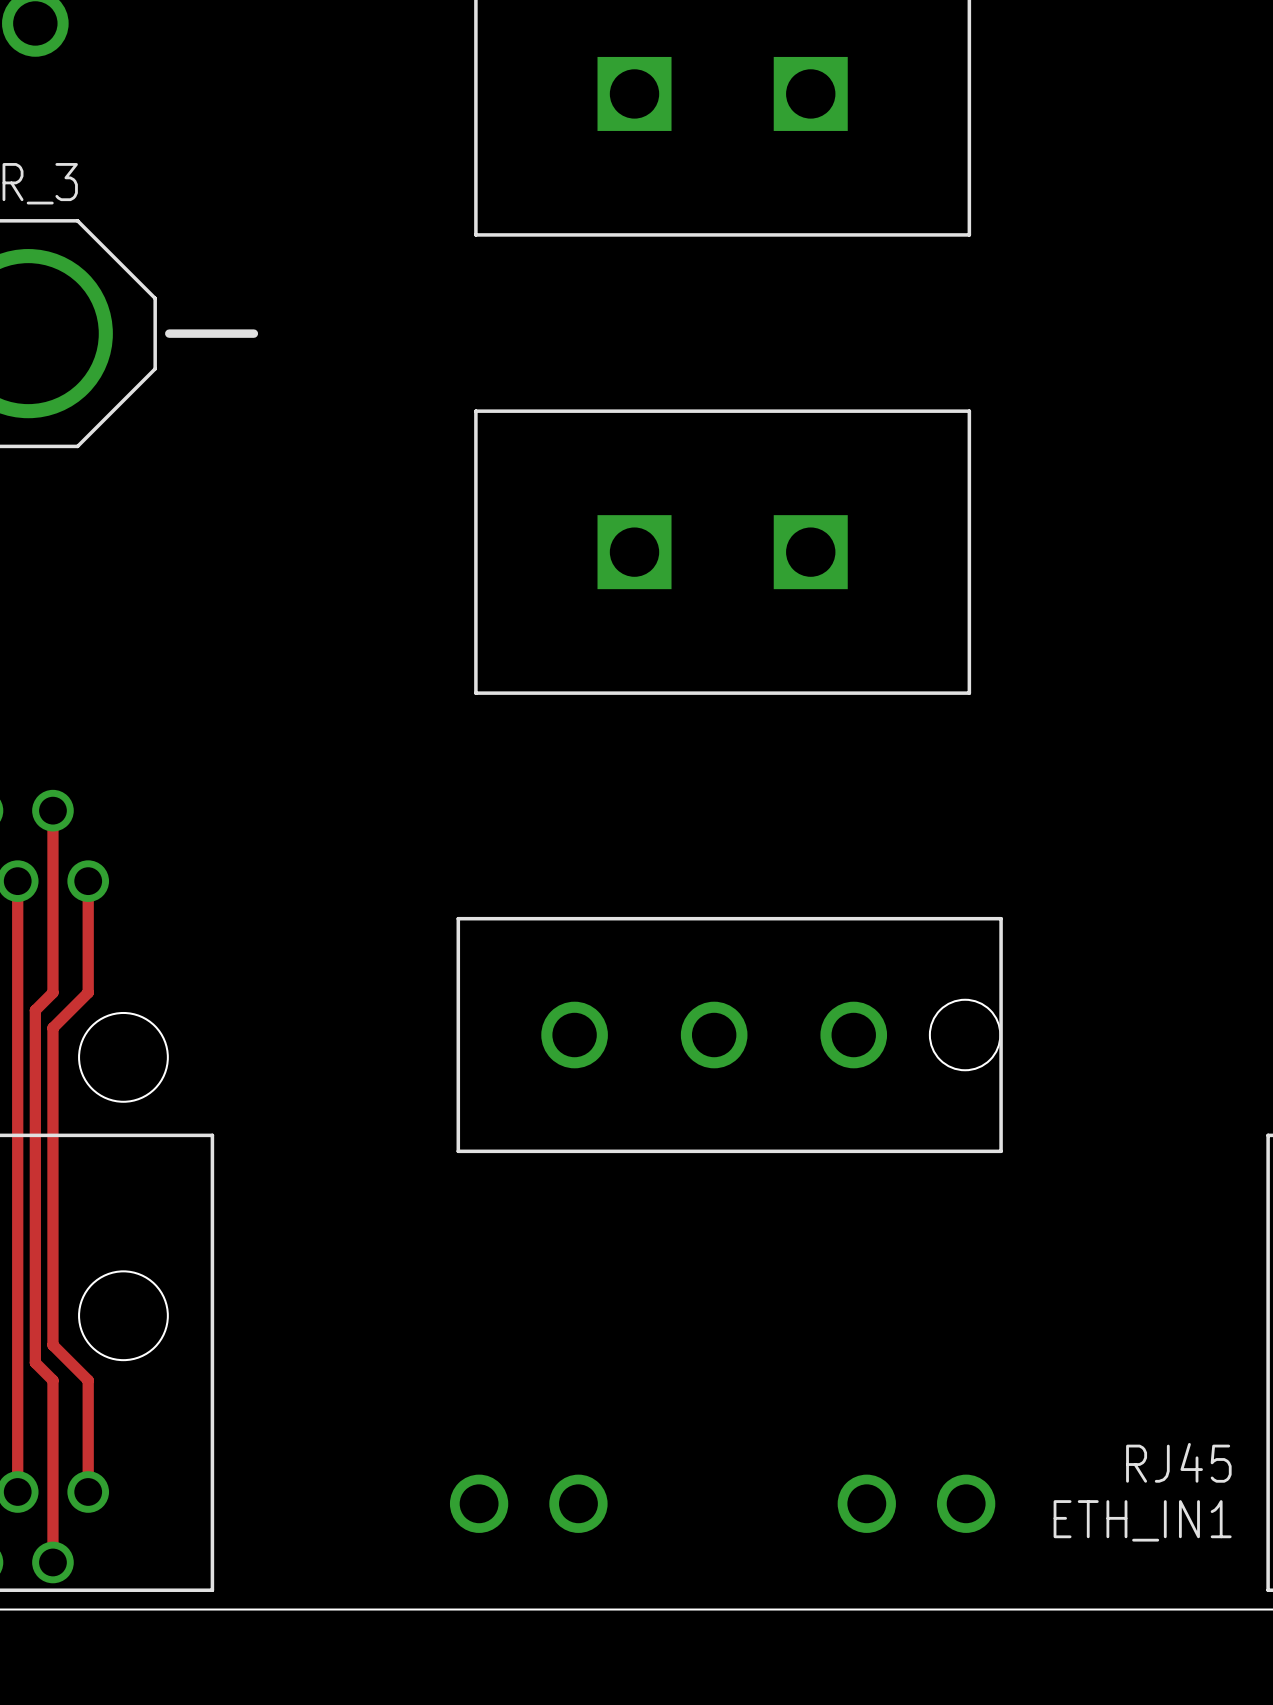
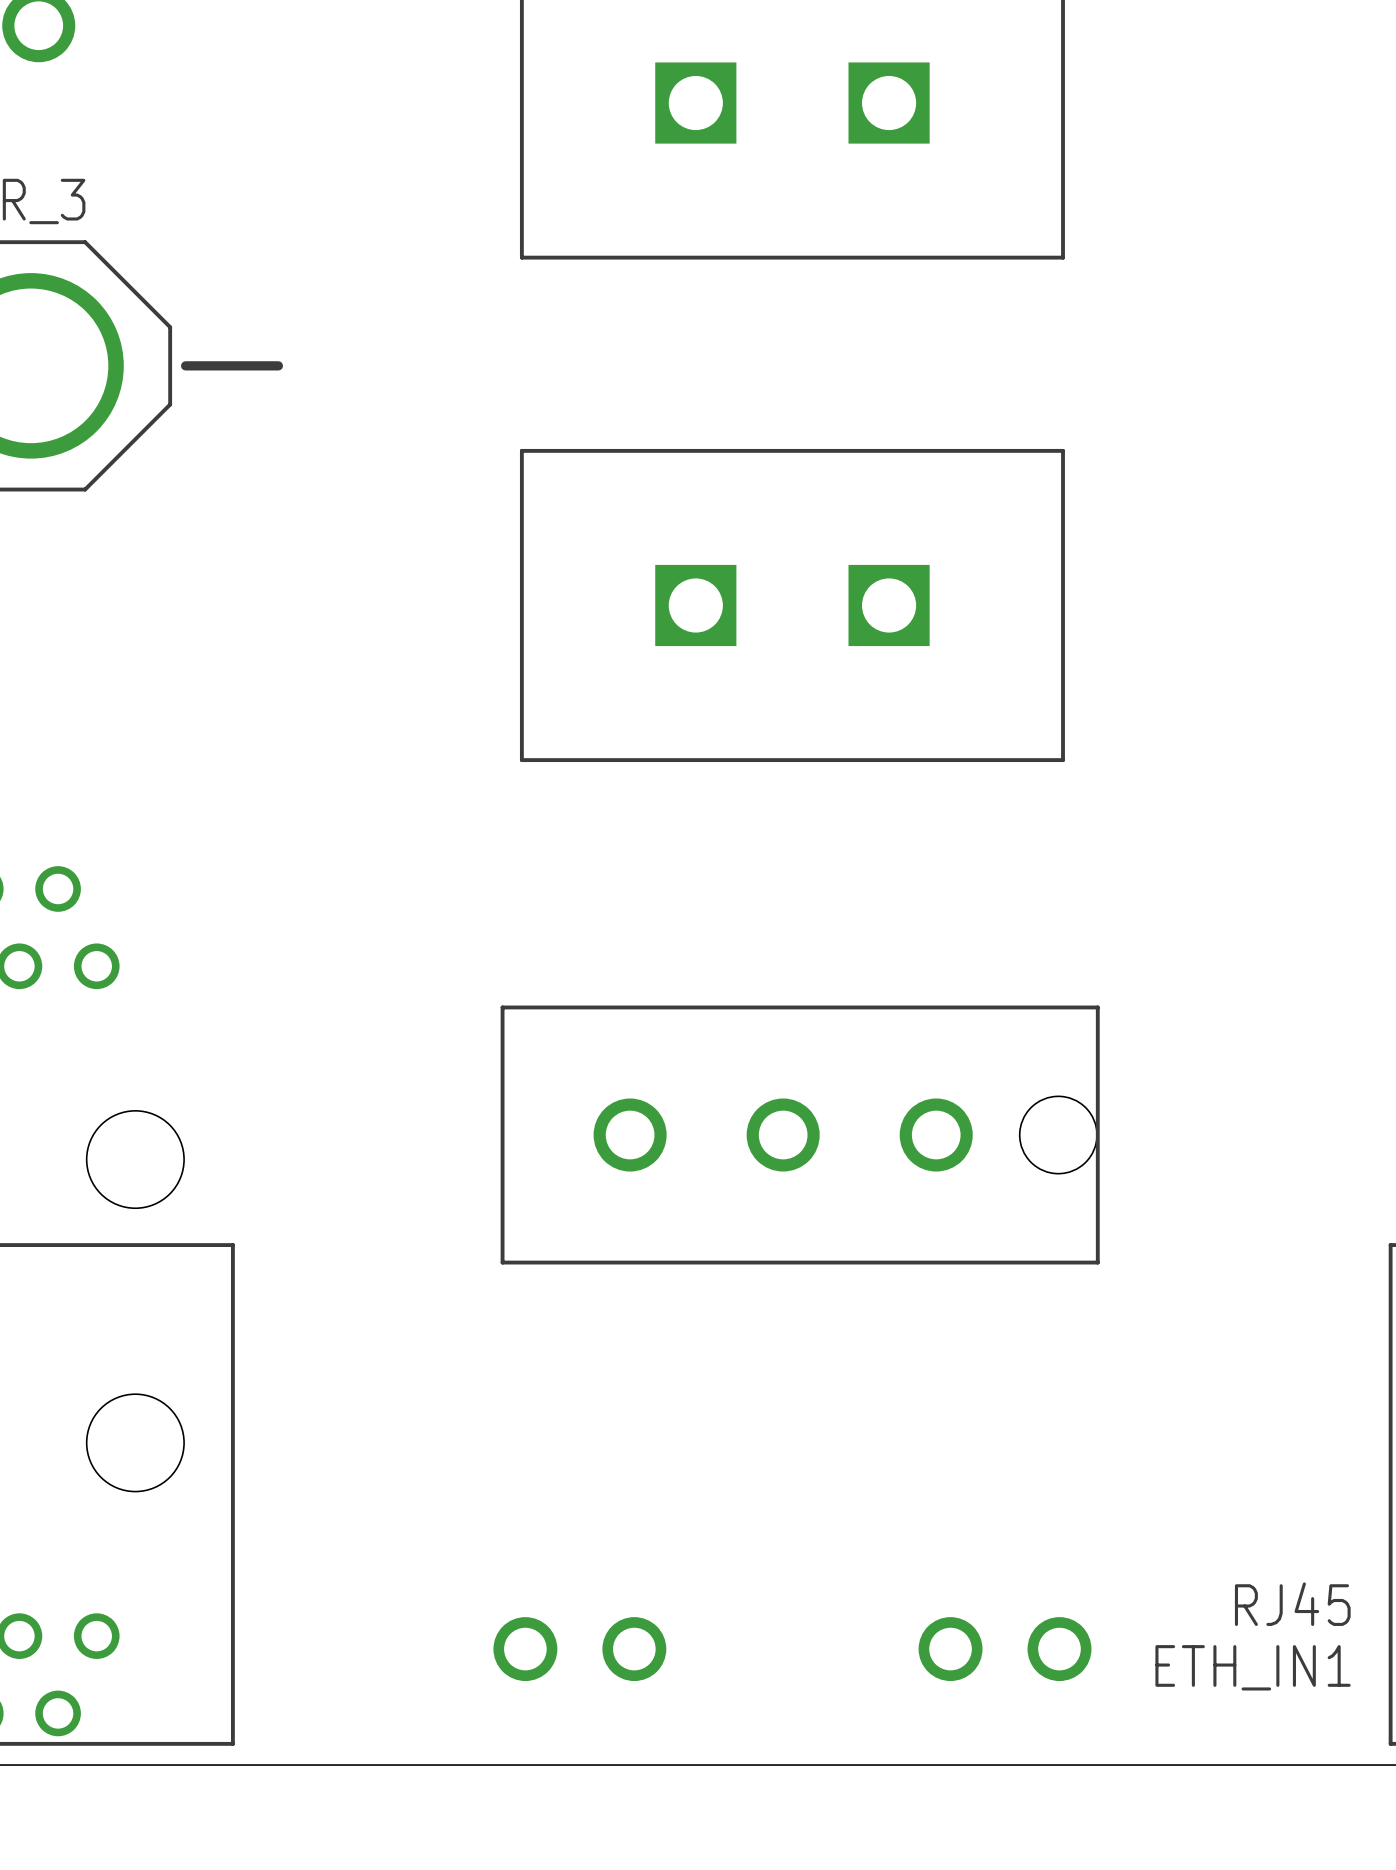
track: (52, 810) (52, 992) (35, 1010) (35, 1362) (52, 1380) (52, 1562) -> none
track: (17, 881) (17, 1491) -> none
track: (88, 881) (88, 992) (52, 1027) (52, 1345) (88, 1380) (88, 1491) -> none

